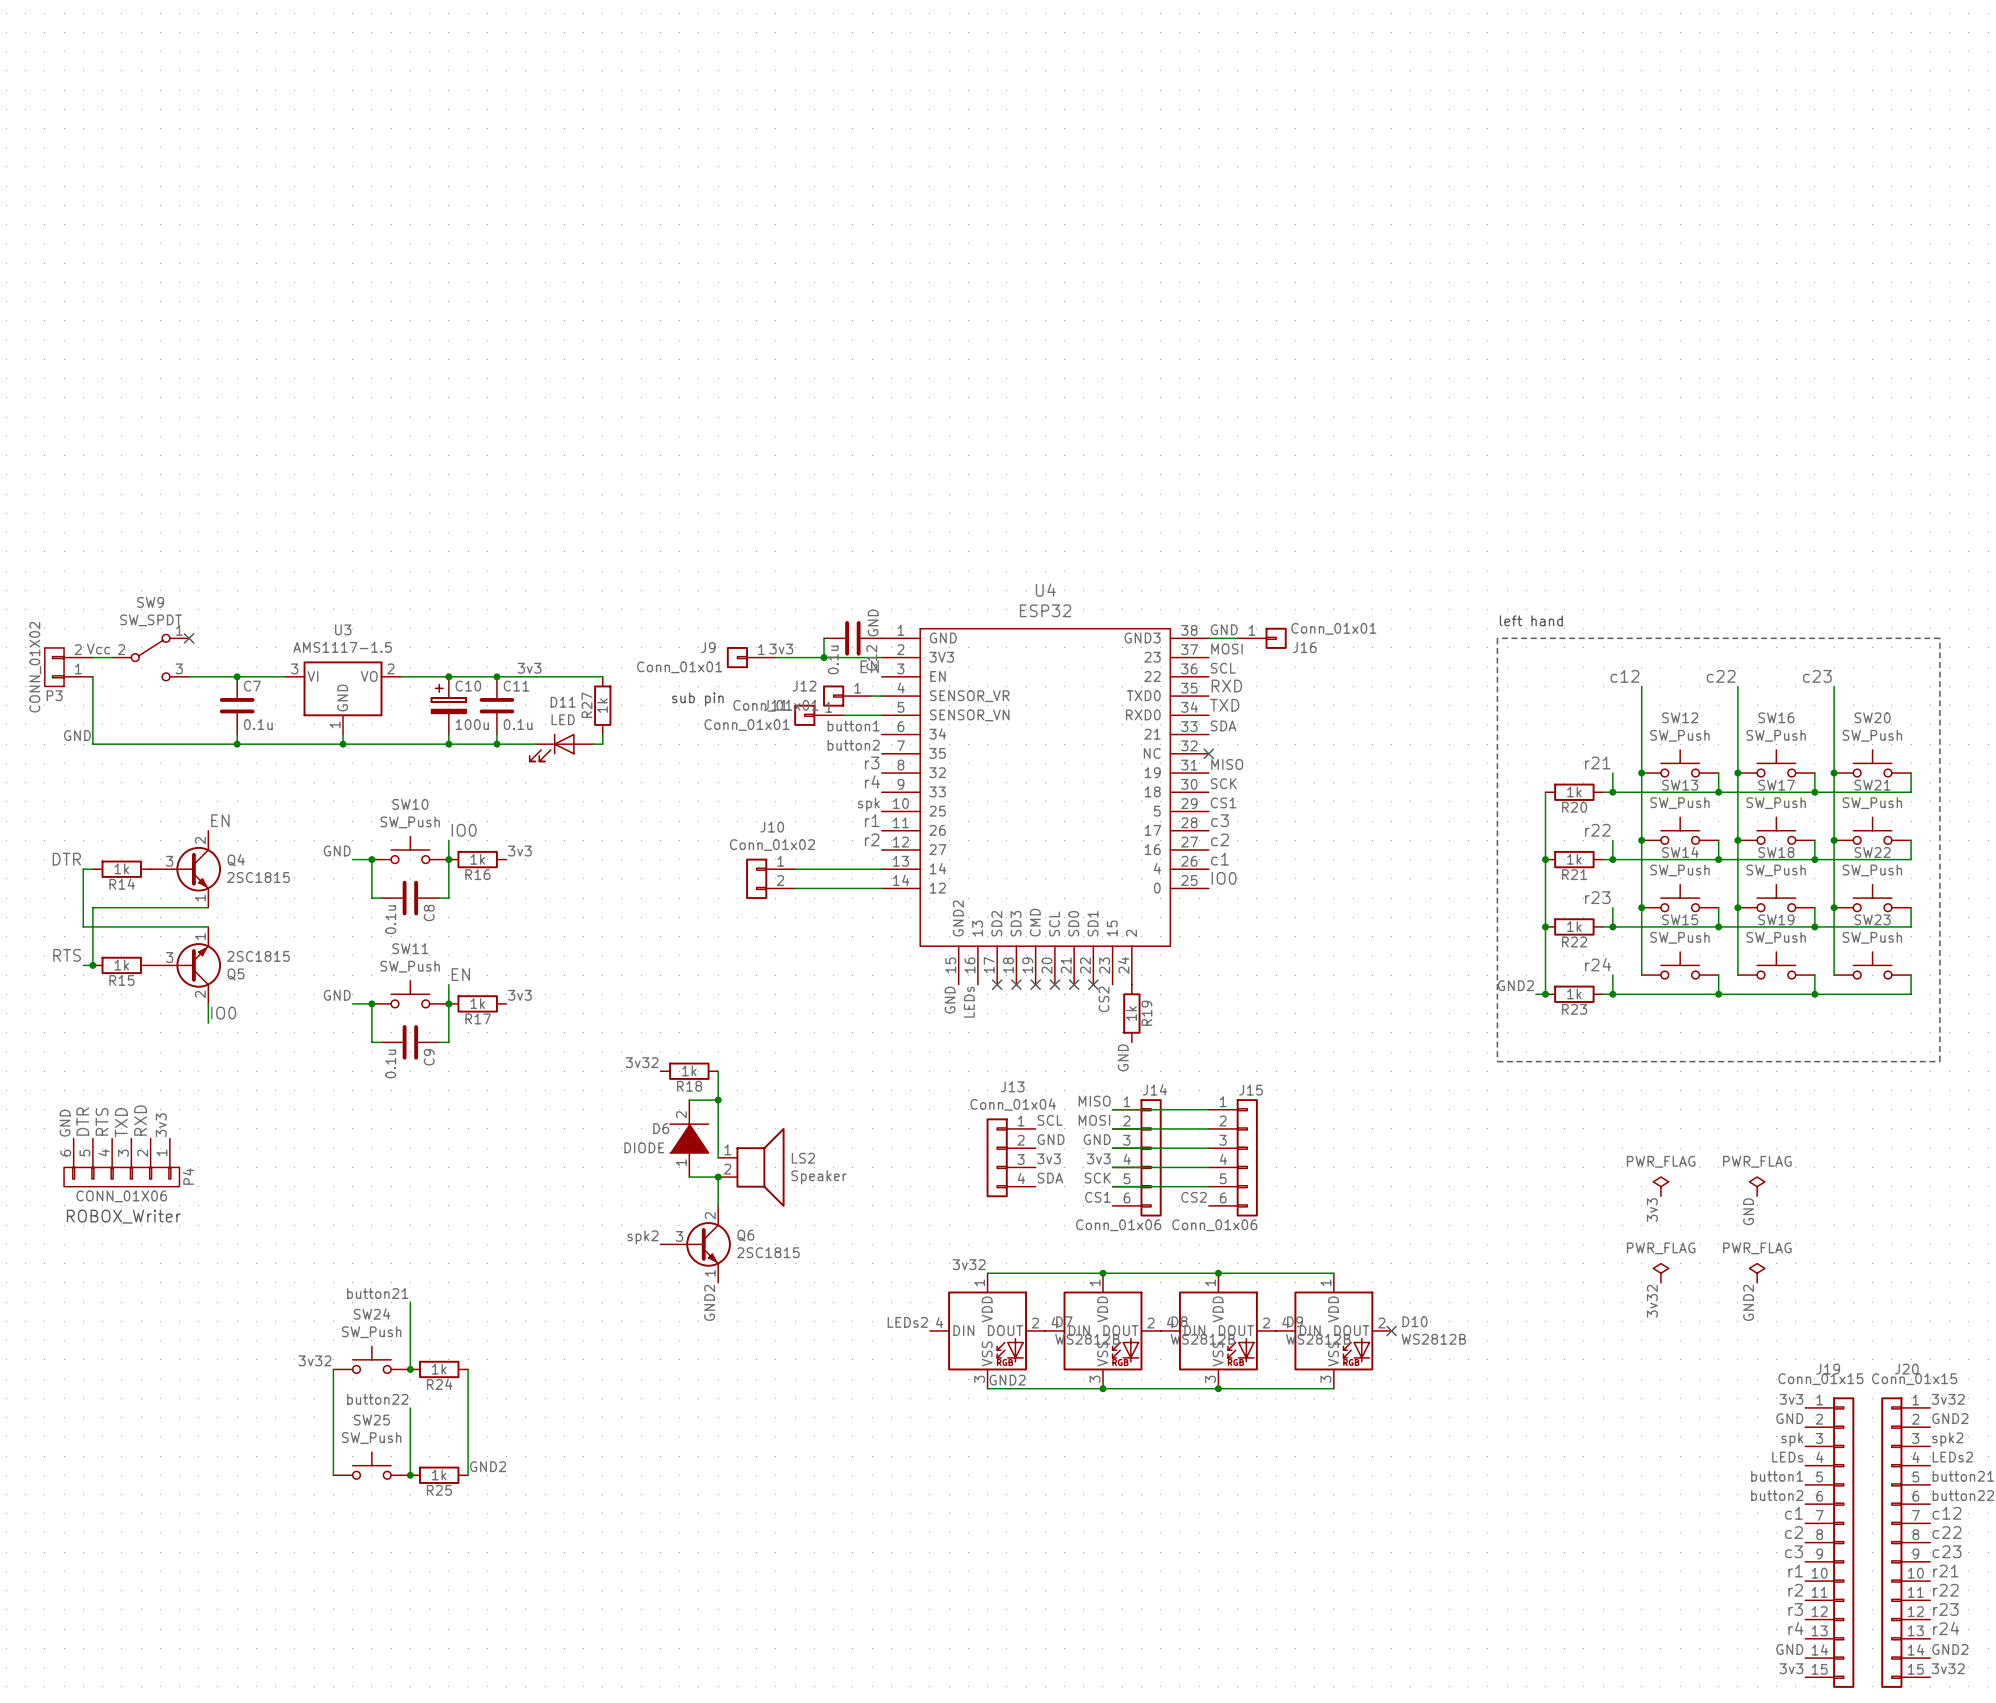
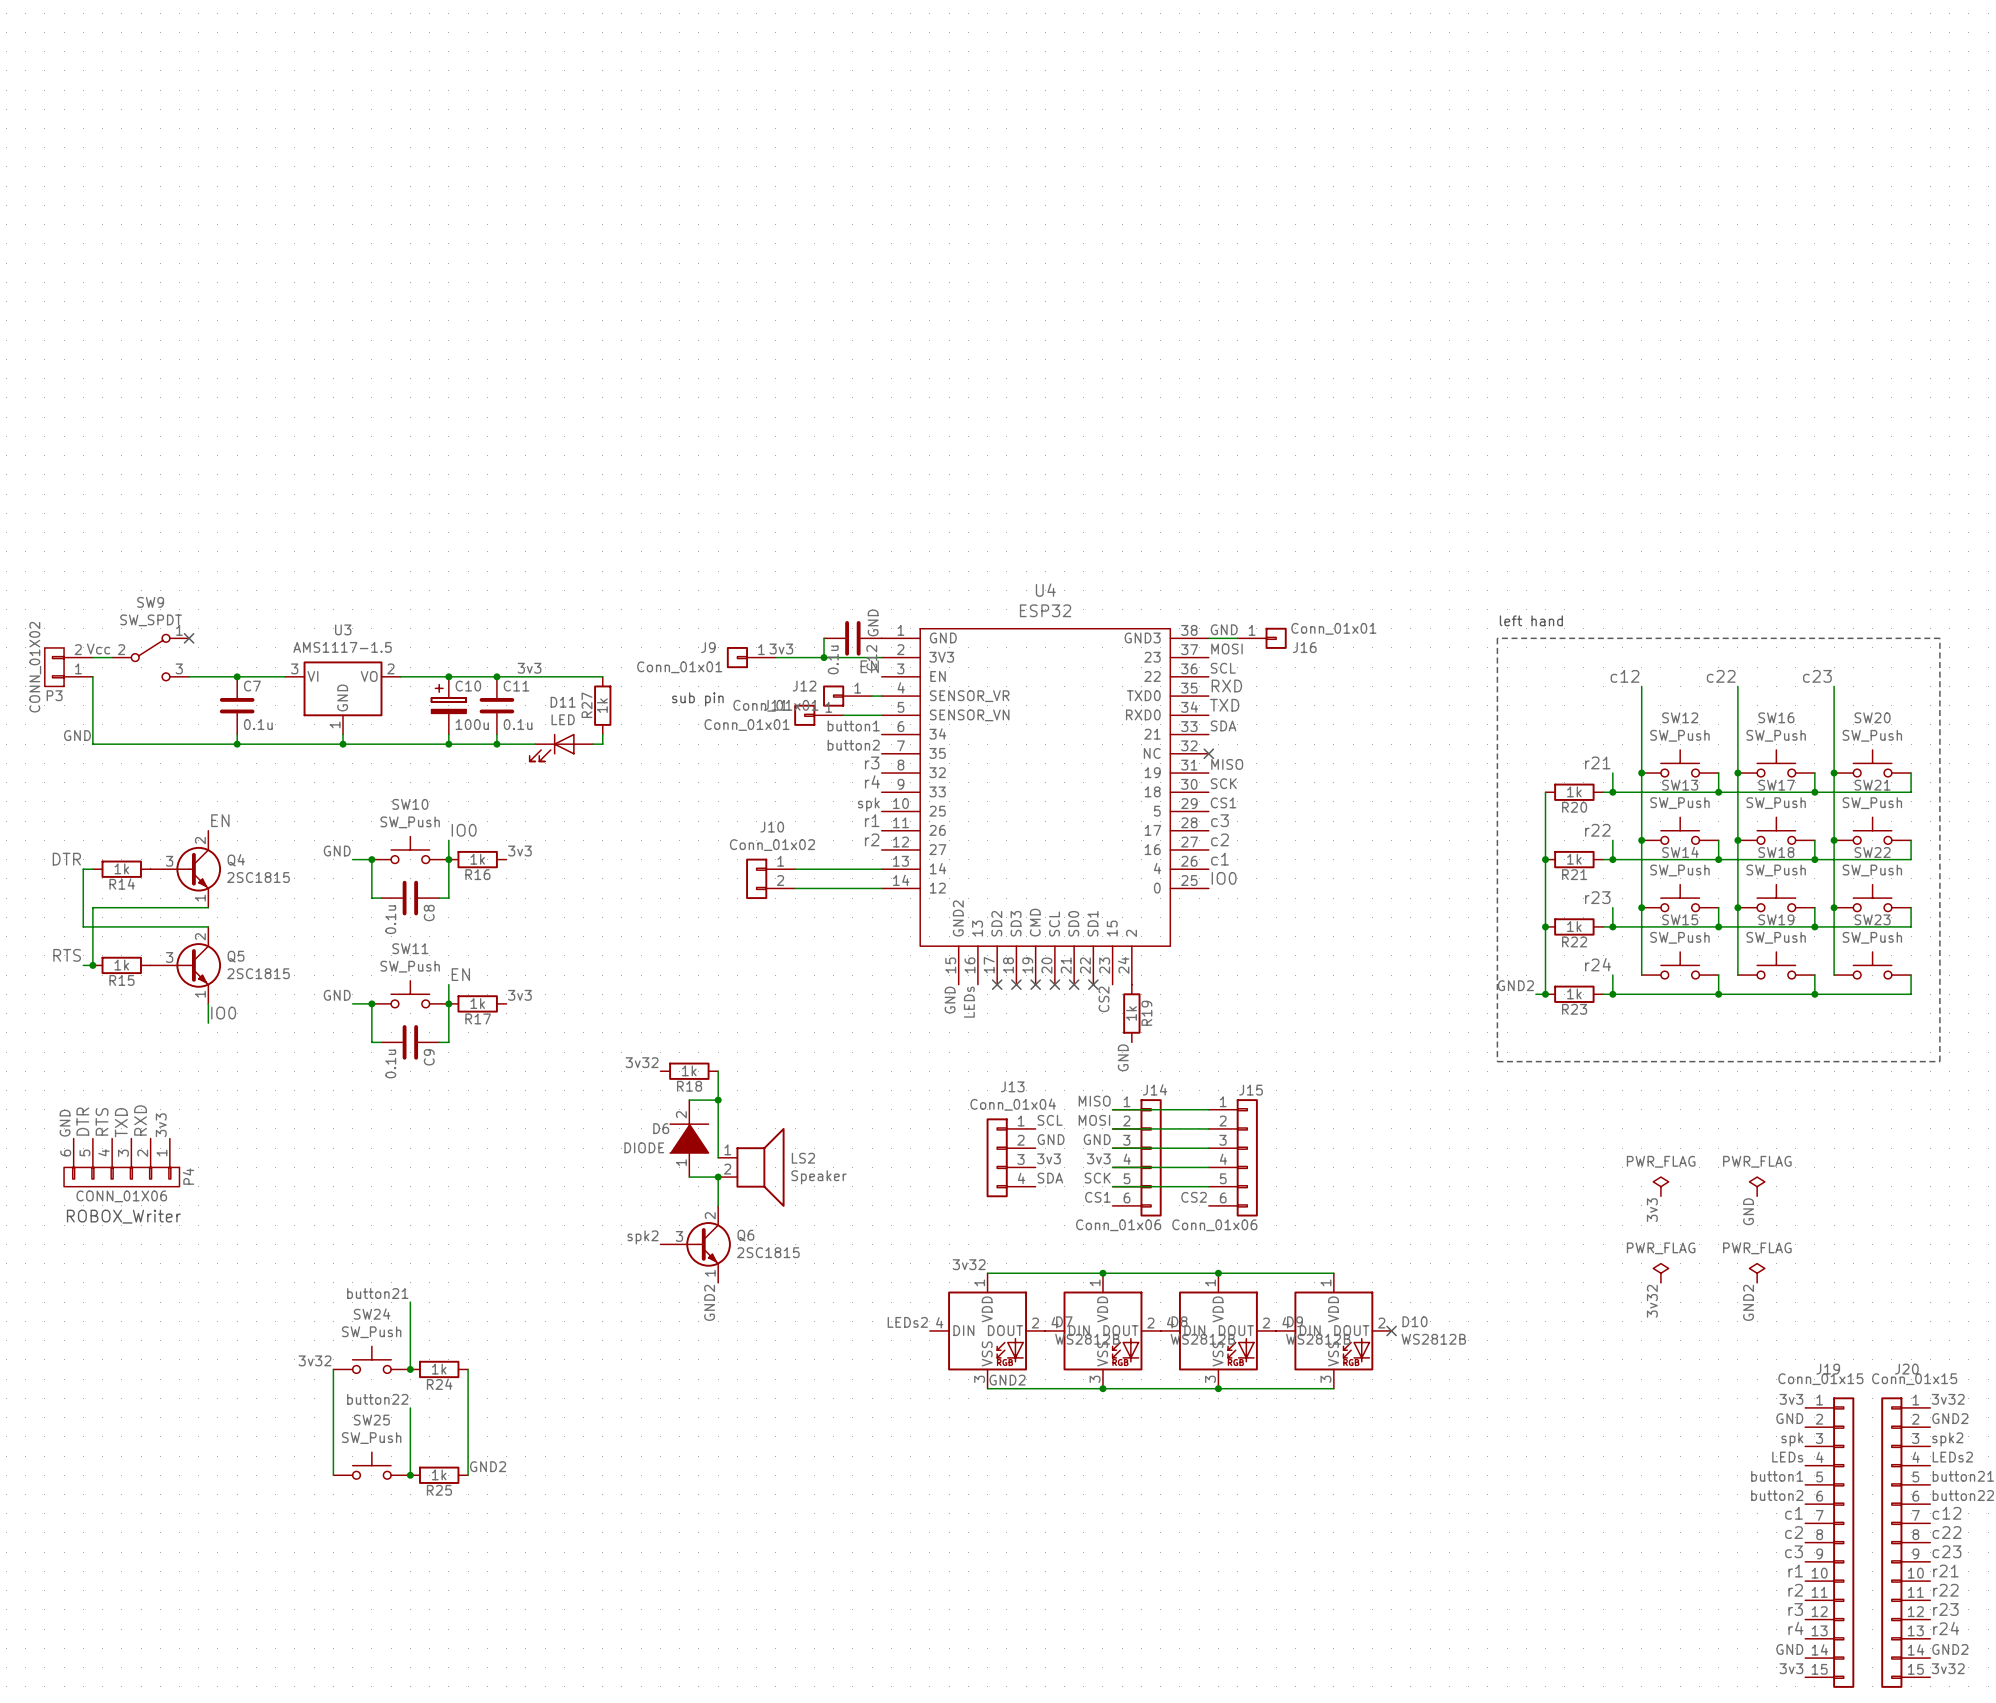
Q5 flip: as is (198, 965) -> up-down (198, 965)

